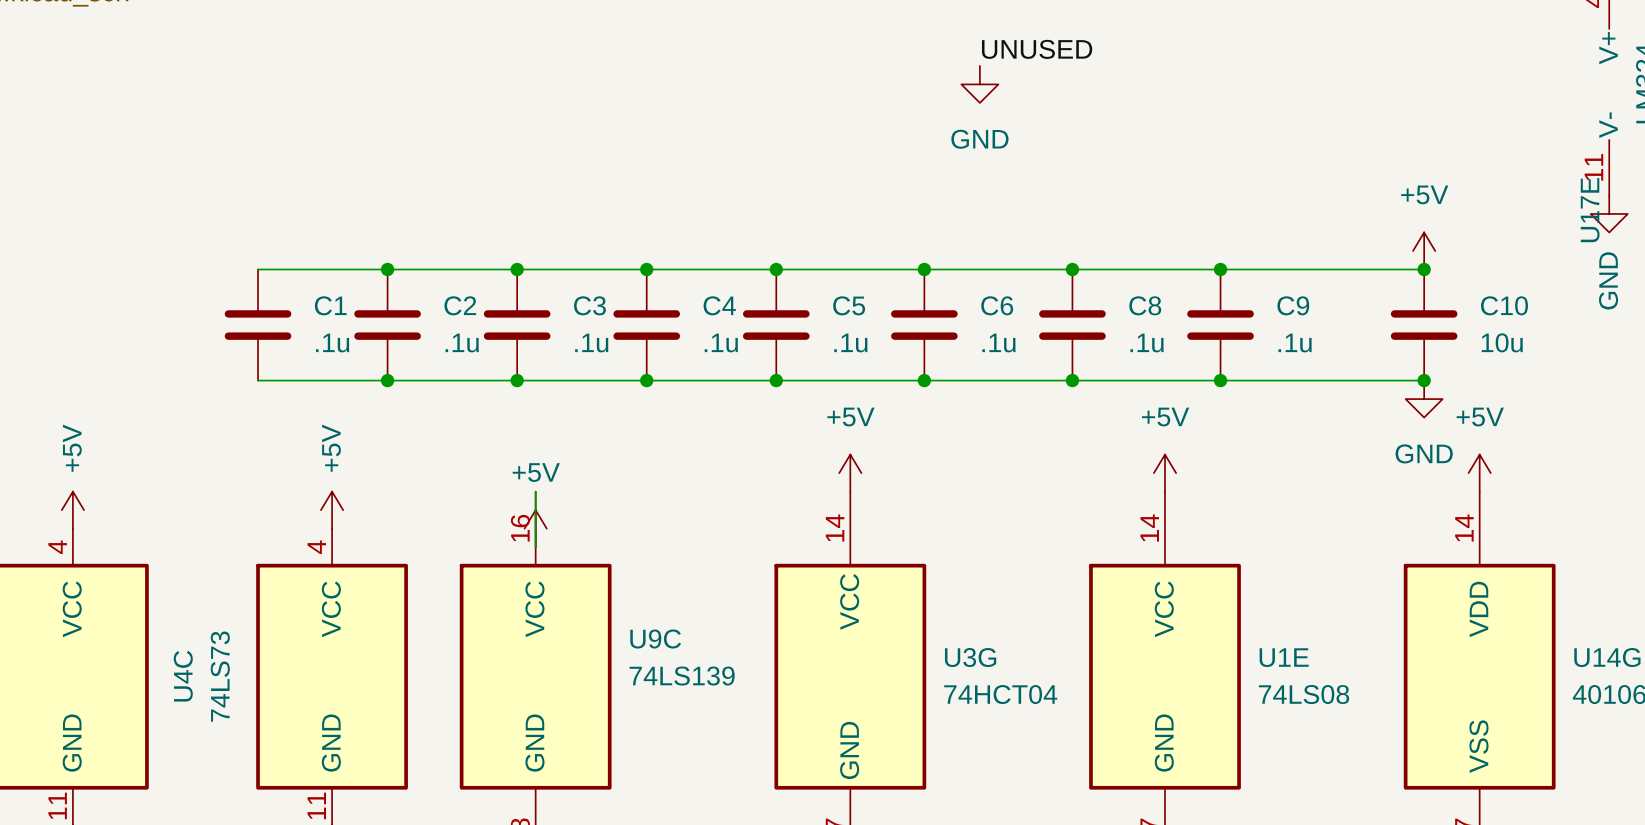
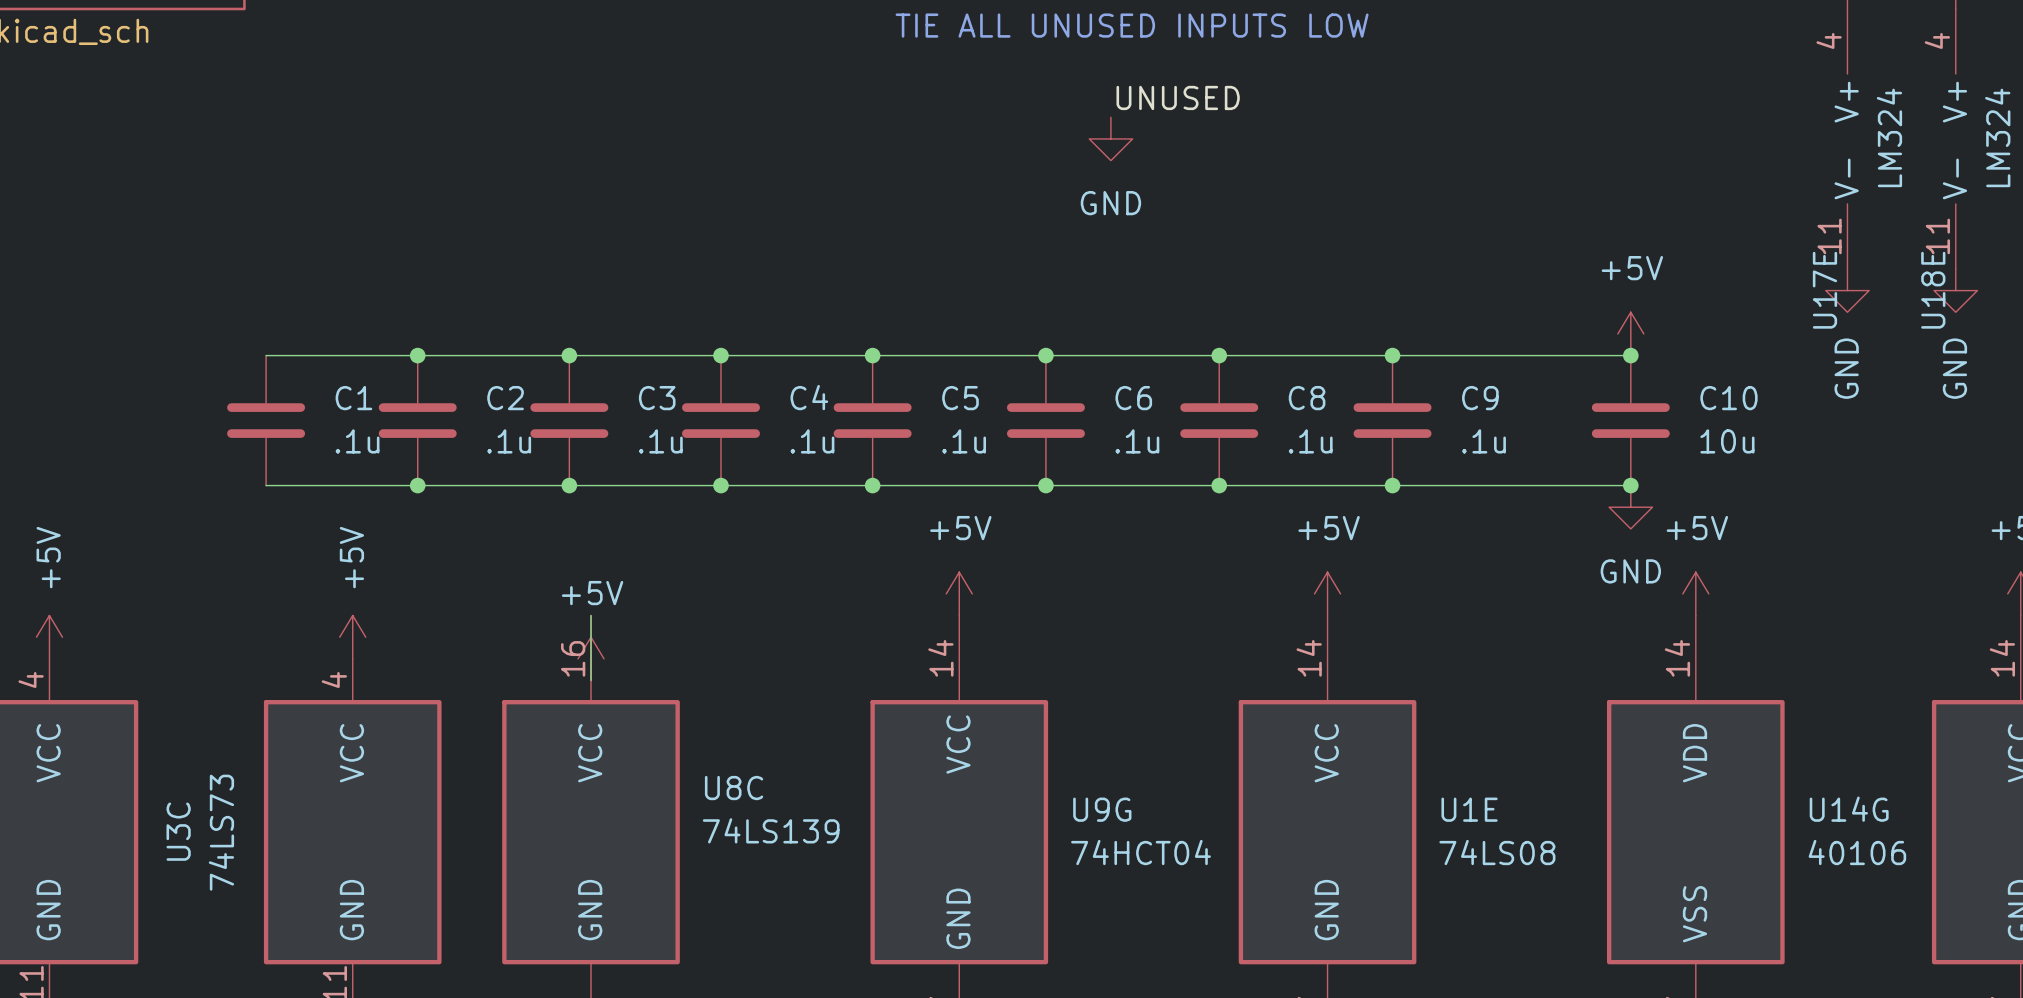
U9C name: U9C (655, 639) -> U8C (734, 788)
U3G name: U3G (970, 657) -> U9G (1102, 809)
U4C name: U4C (183, 676) -> U3C (178, 831)

